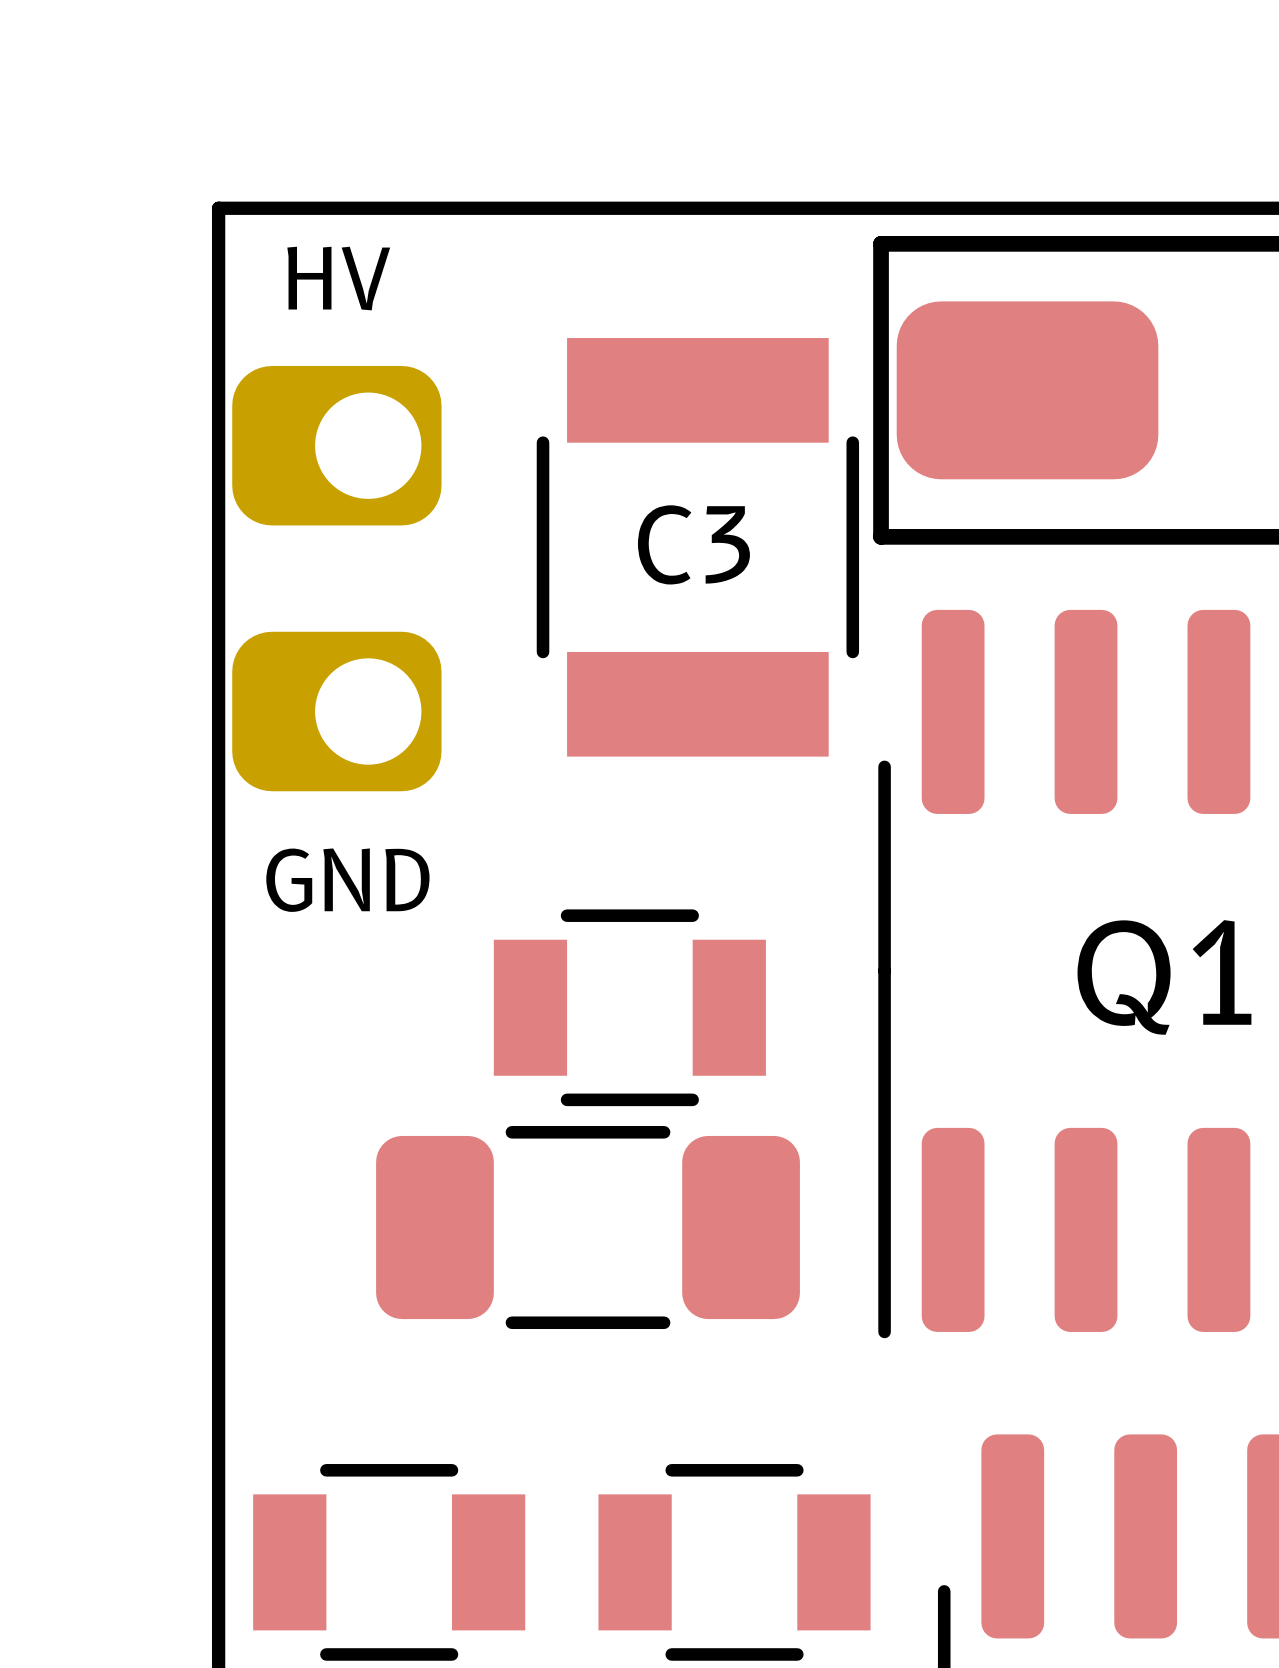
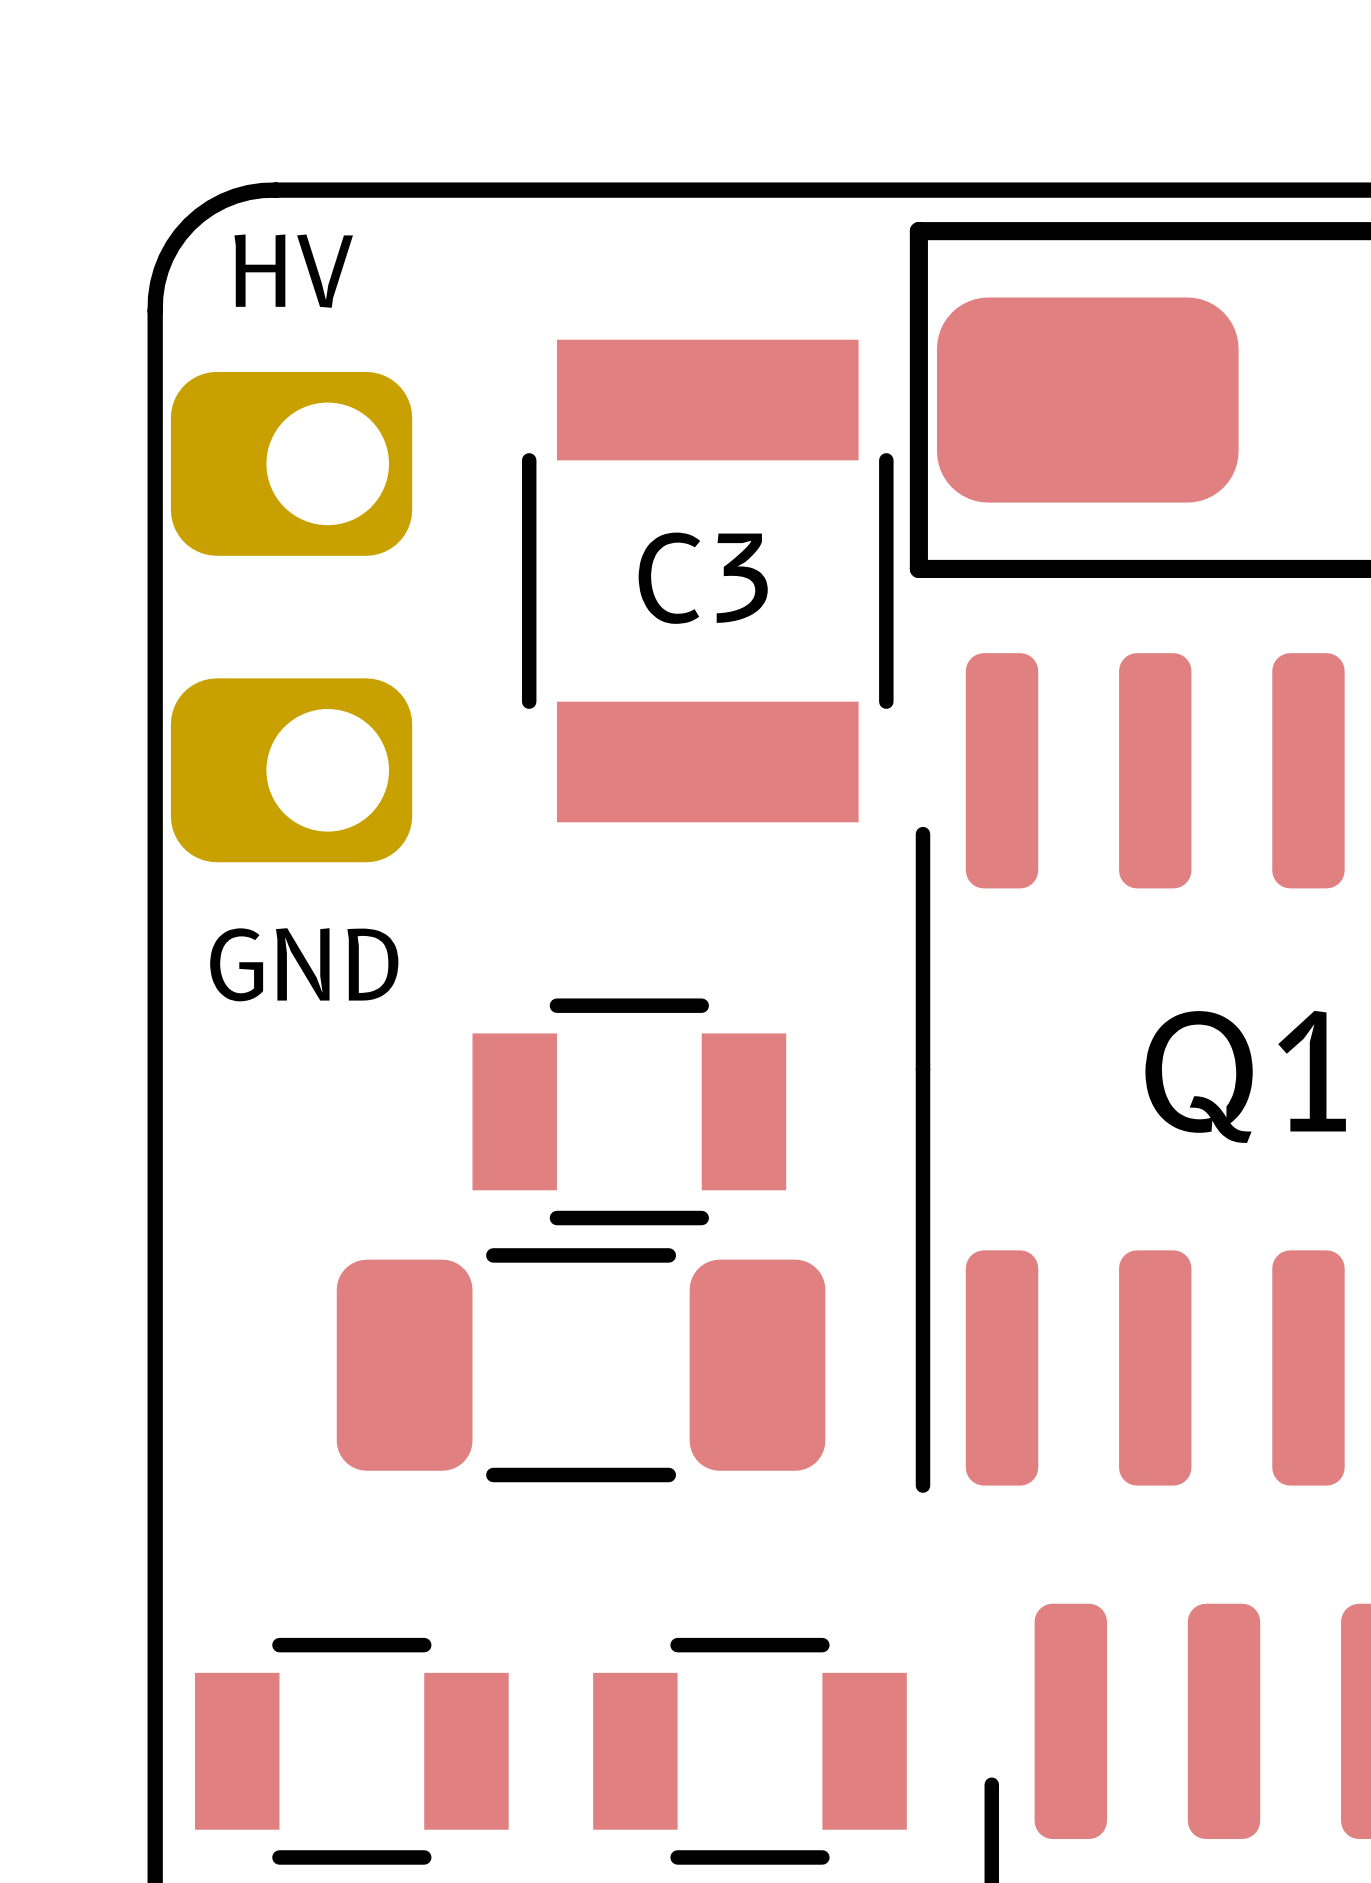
board edge: (323, 208) (218, 208) (218, 312) -> (275, 190) (248, 192) (222, 201) (210, 207) (189, 224) (172, 245) (161, 270) (157, 283) (155, 310)

